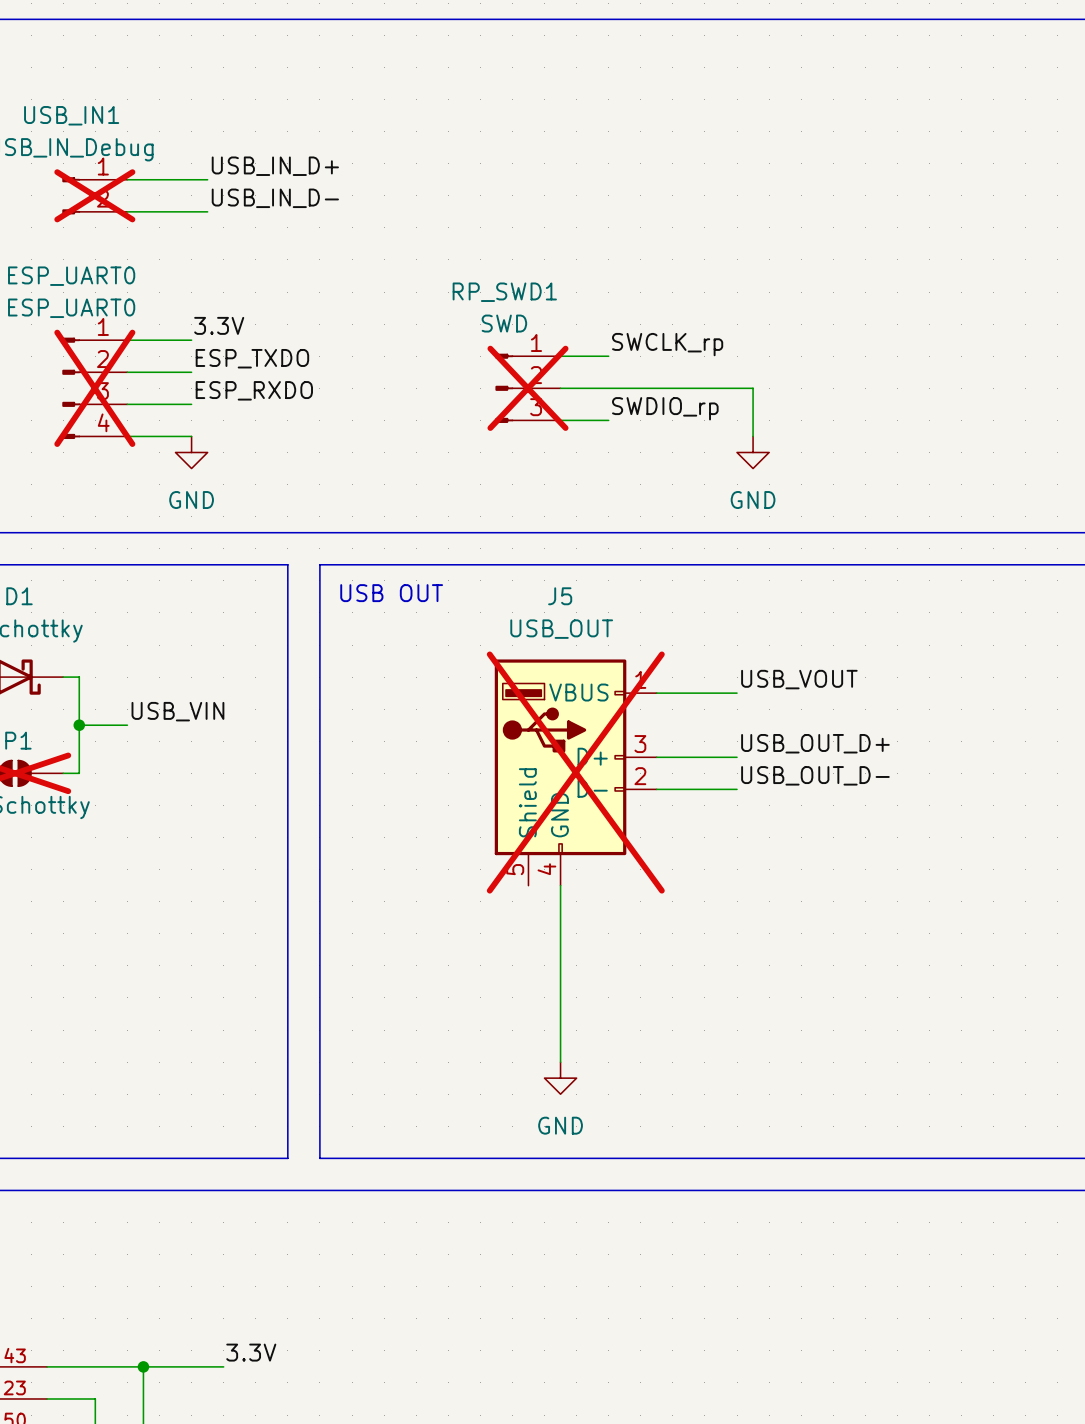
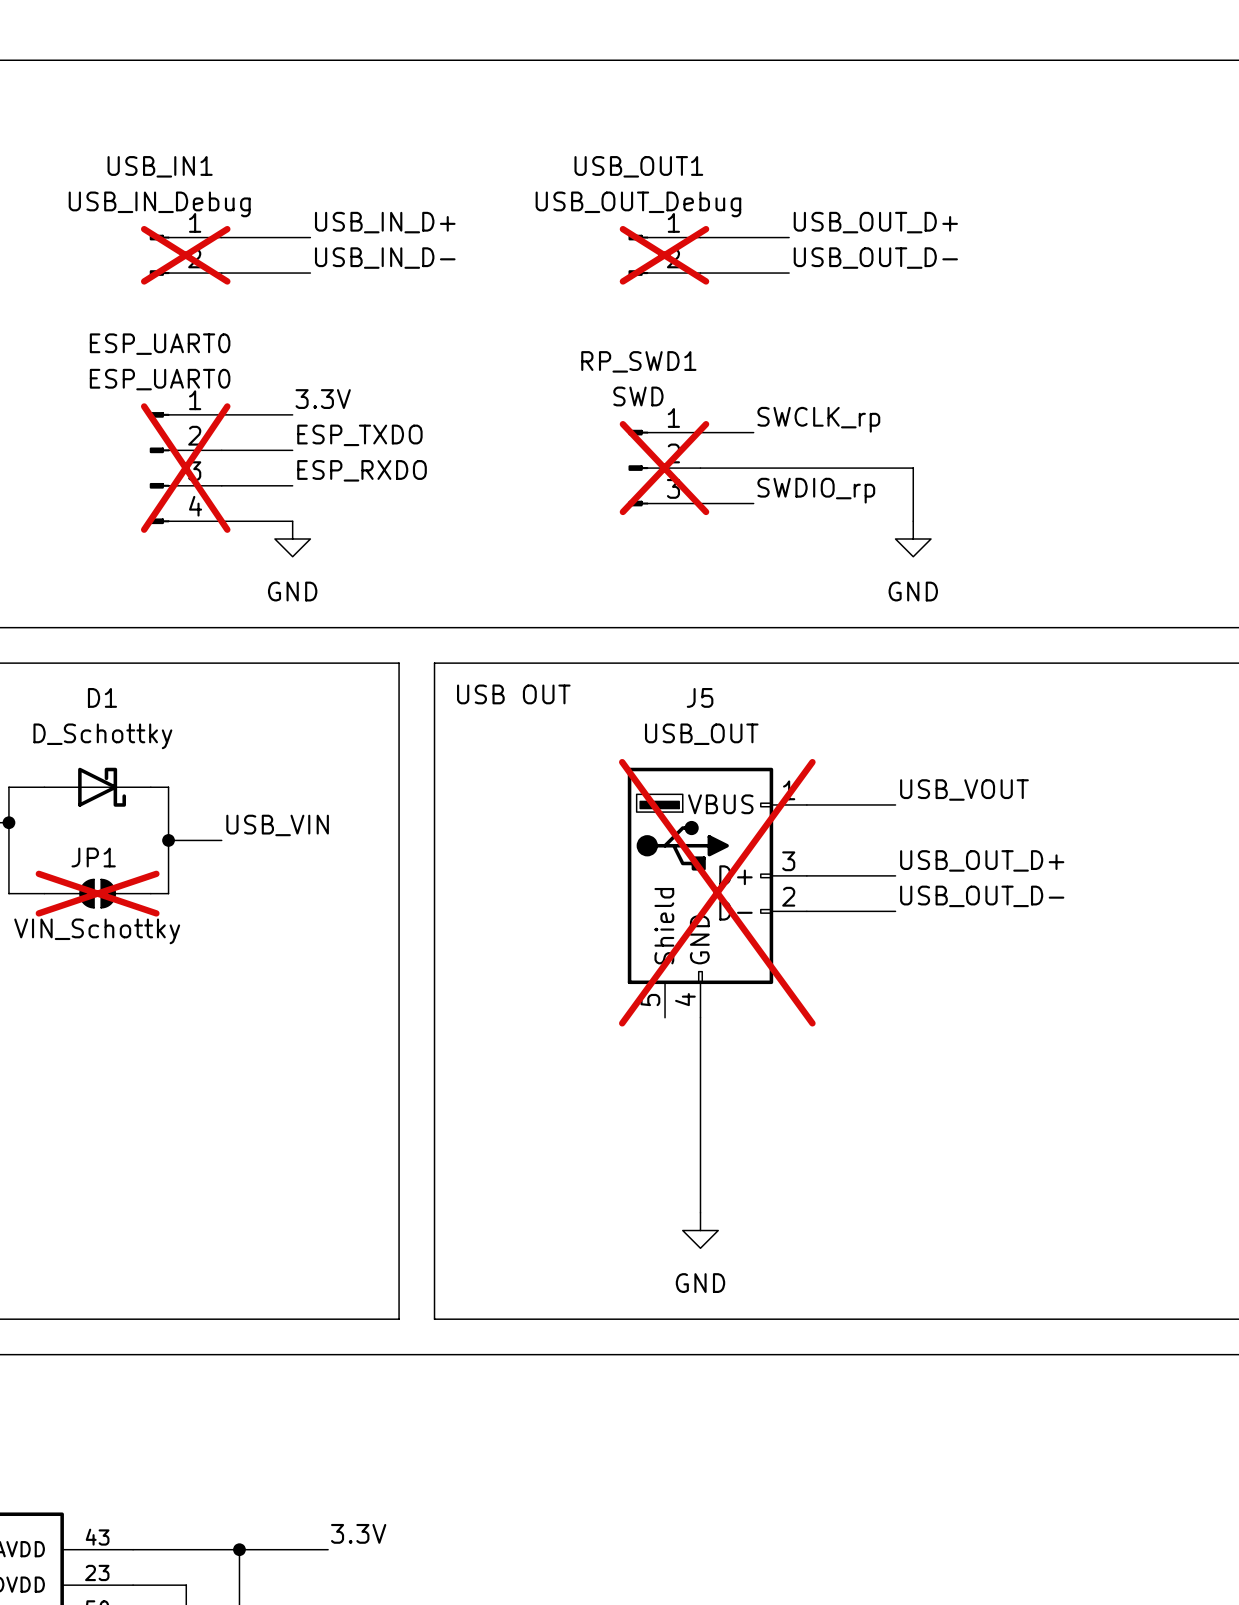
label: none -> USB_OUT_D+ (875, 222)
wire: none -> (700, 237) (789, 237)
USB_OUT1: none -> USB_OUT_Debug (664, 255)
label: none -> USB_OUT_D- (875, 258)
wire: none -> (700, 273) (789, 273)

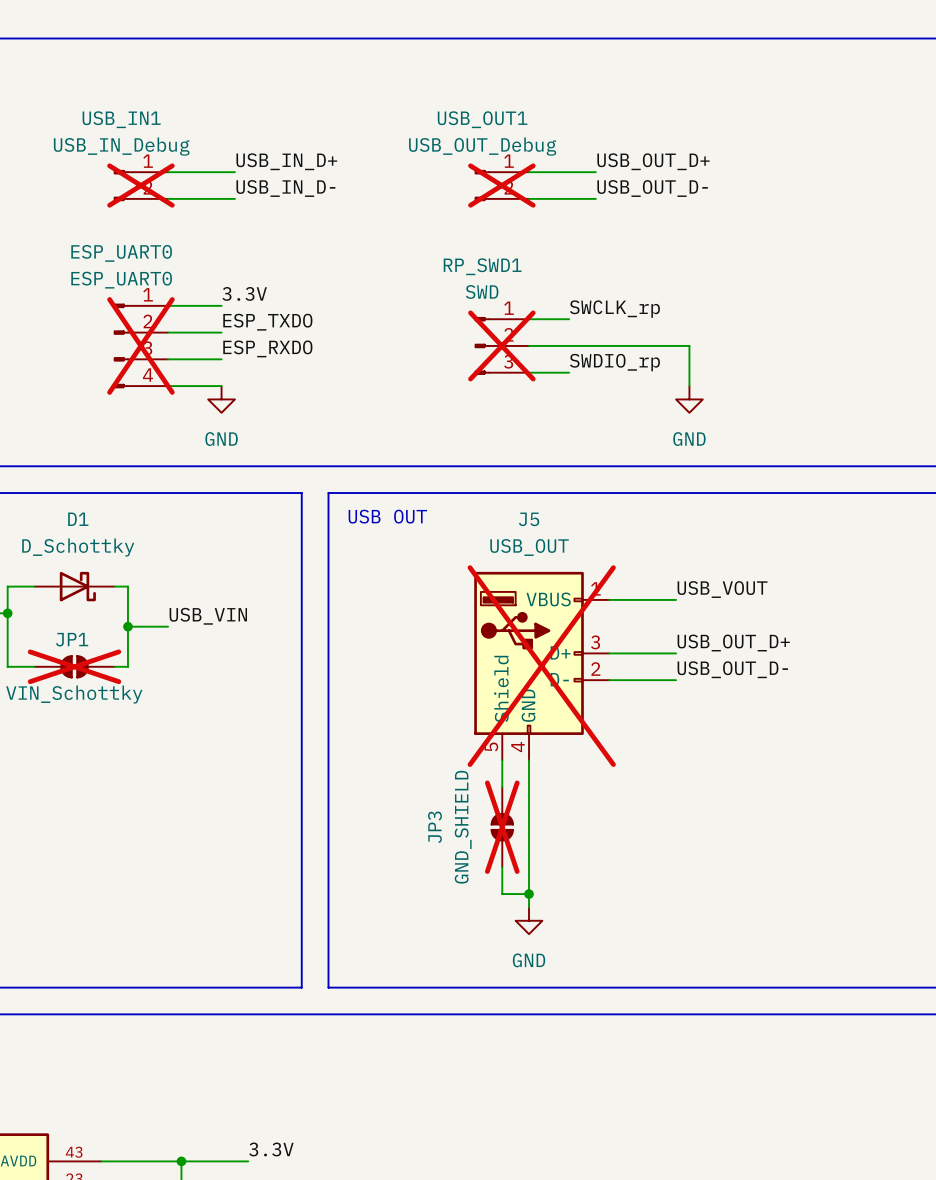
wire: none -> (502, 760) (502, 787)
JP3: none -> GND_SHIELD (502, 827)
wire: none -> (502, 867) (502, 894) (529, 894)
junction: none -> (529, 894)

